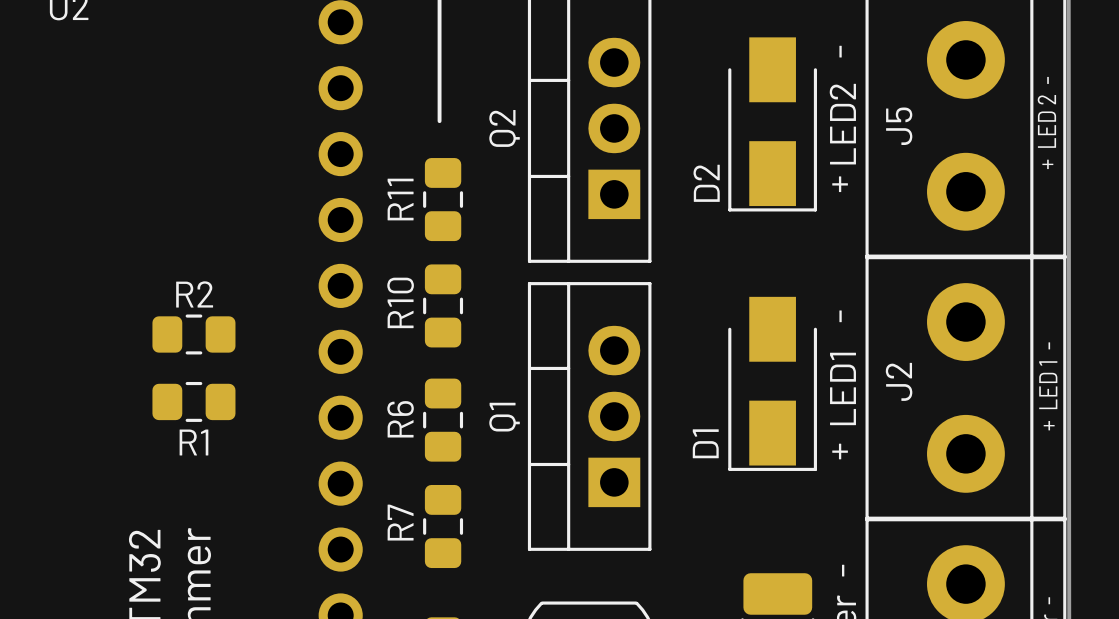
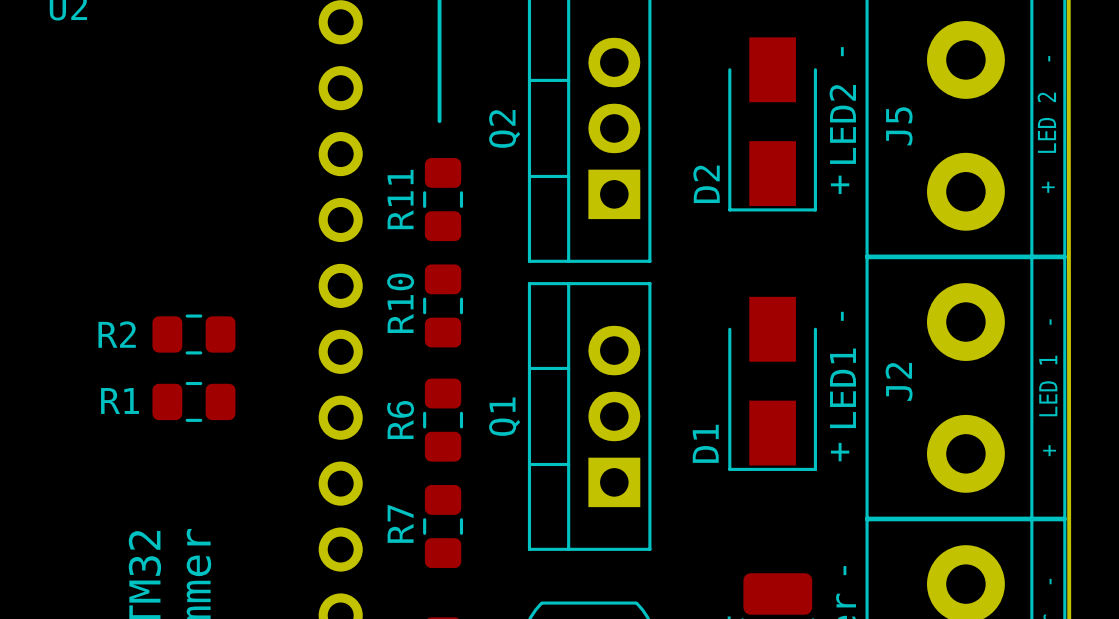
R2 name position: R2 (194, 294) -> R2 (117, 334)
R1 name position: R1 (193, 442) -> R1 (120, 400)

